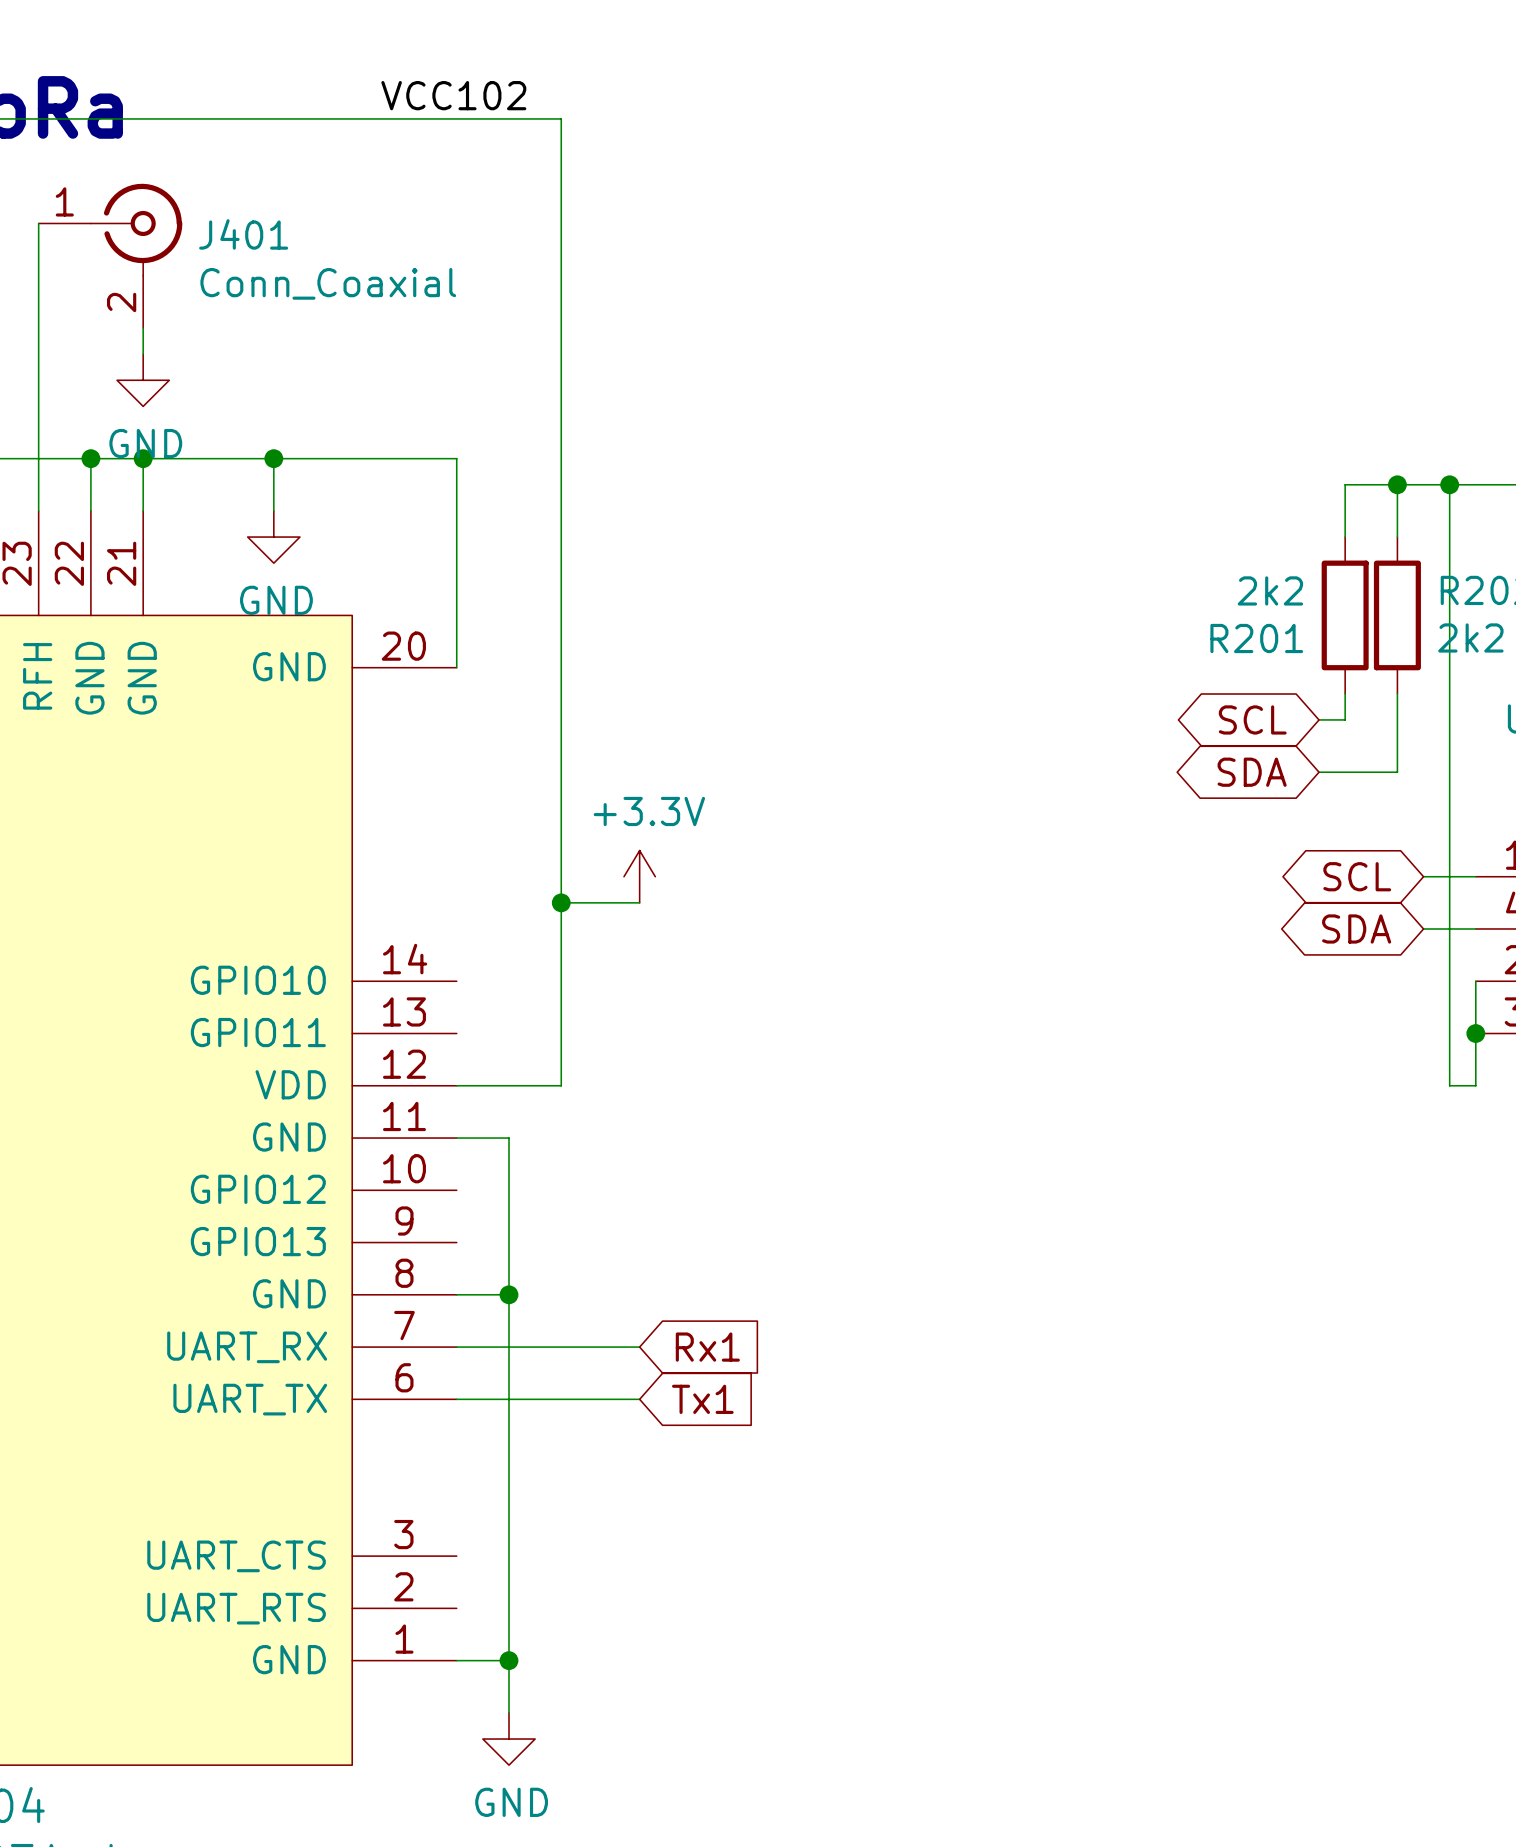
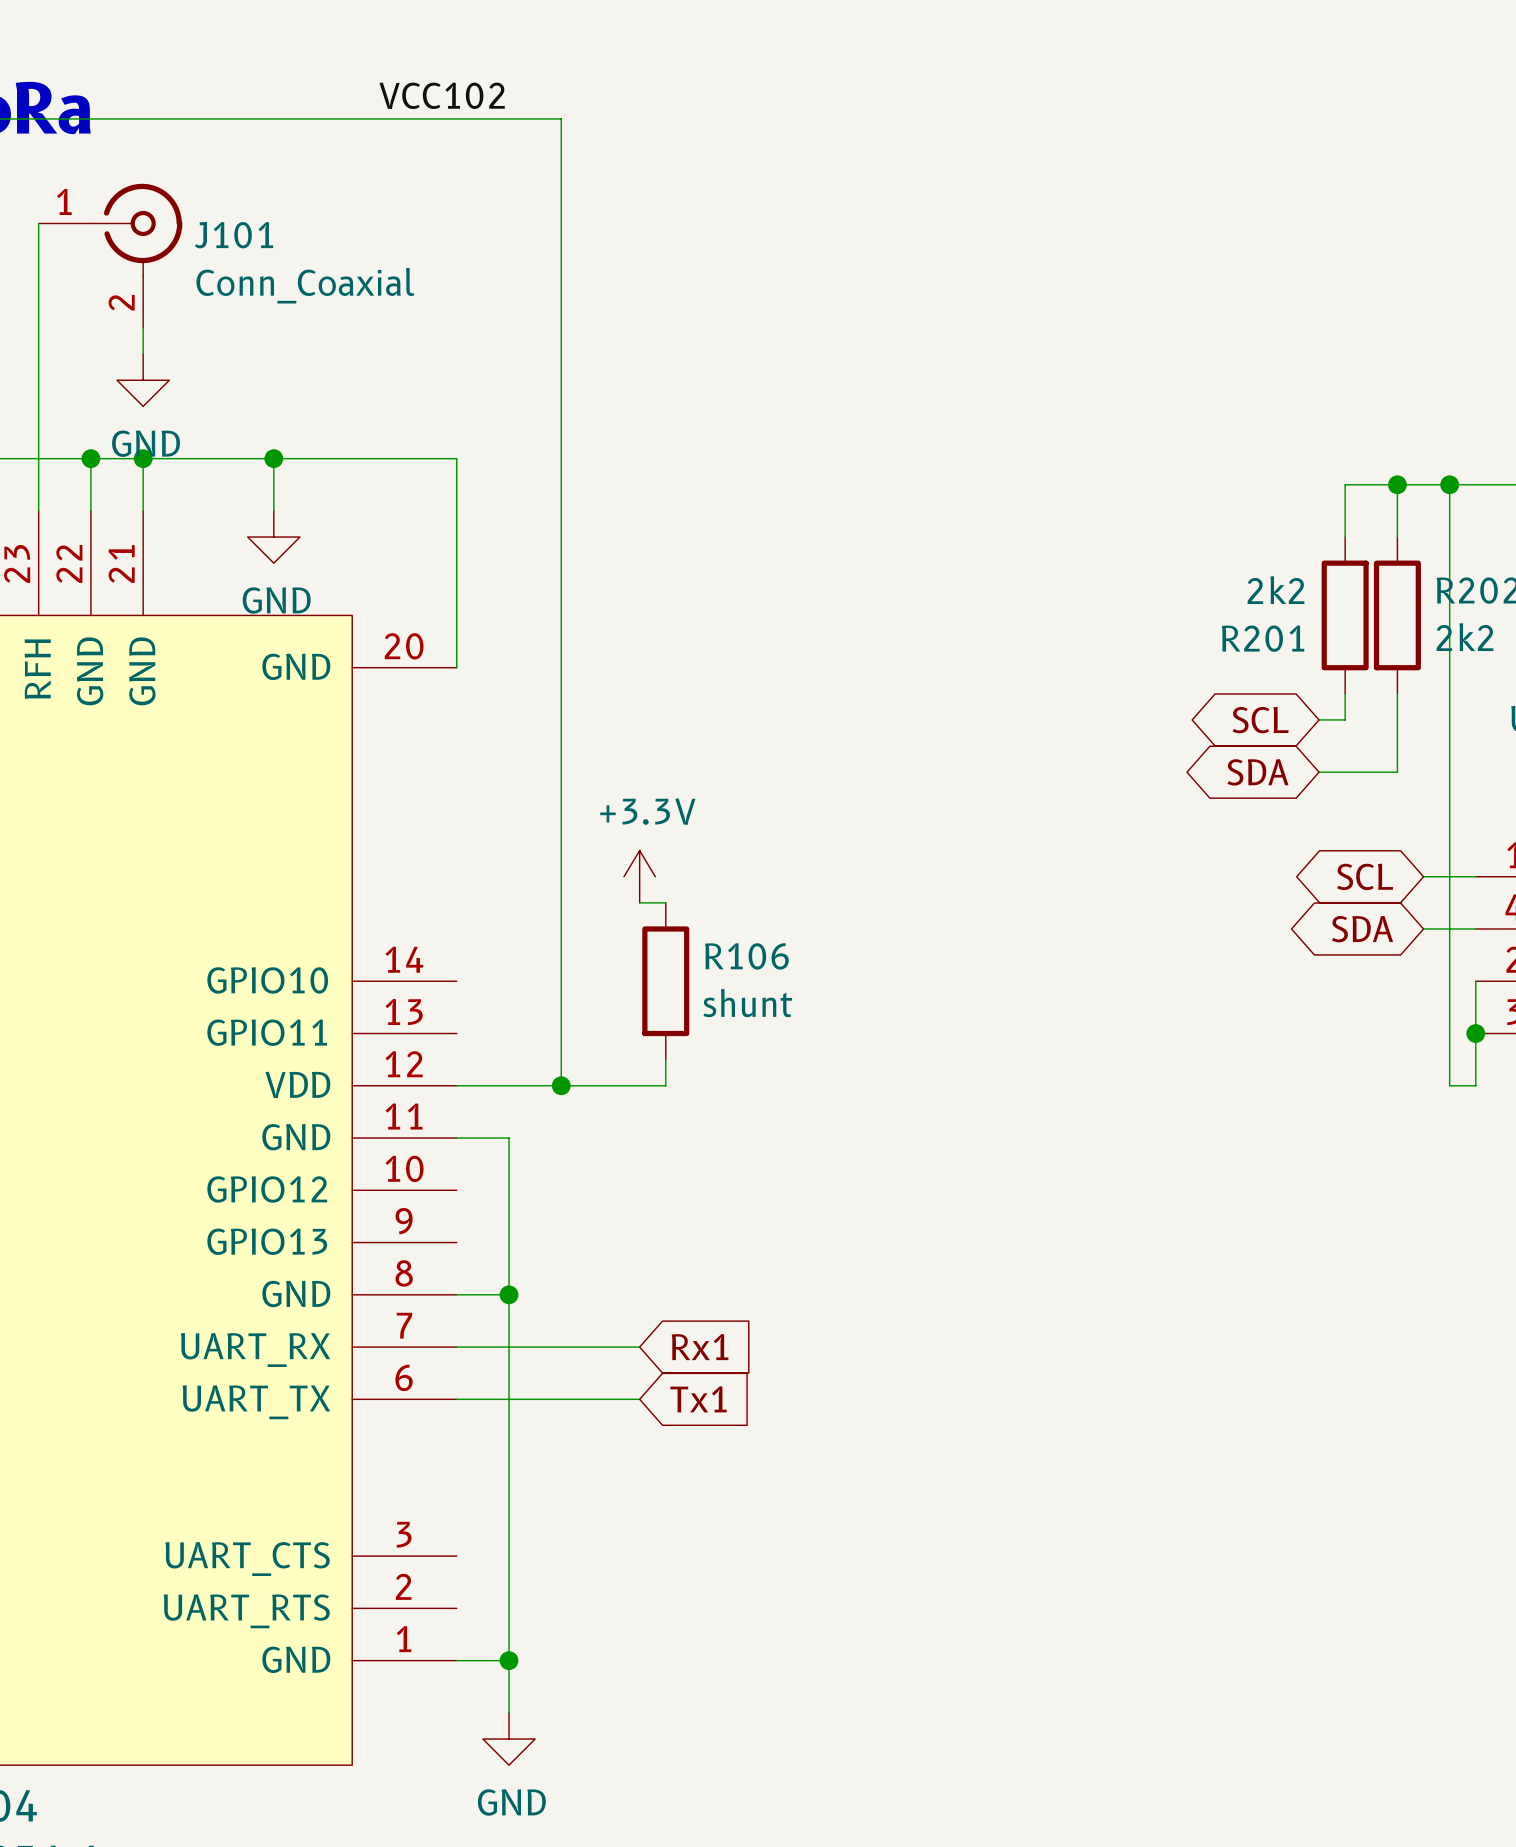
J401 name: J401 (243, 234) -> J101 (234, 235)
wire: (561, 902) (639, 902) -> (665, 902) (639, 902)
junction: (561, 902) -> none
R106: none -> shunt (665, 981)
wire: none -> (665, 1059) (665, 1085) (561, 1085)
junction: none -> (561, 1085)

